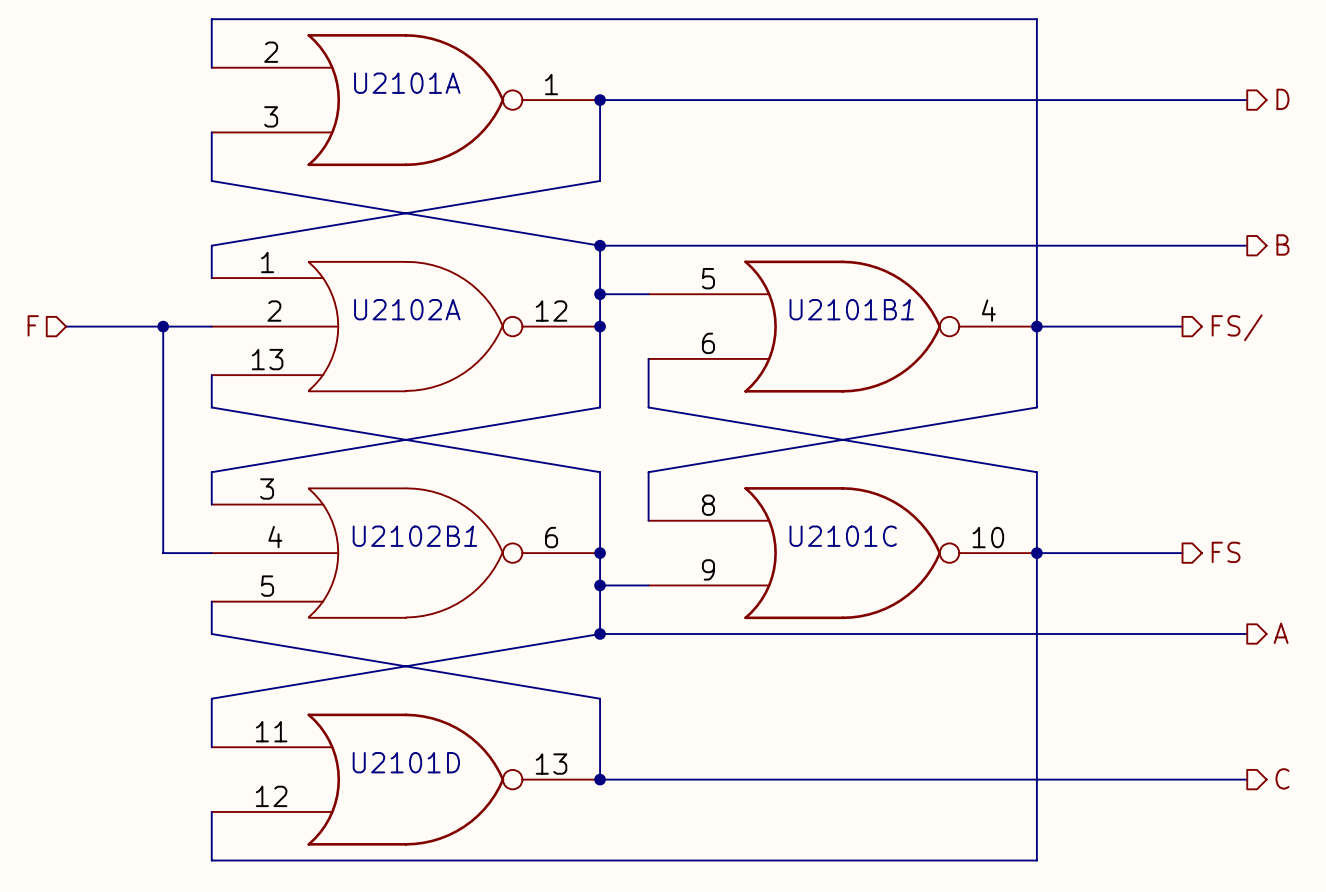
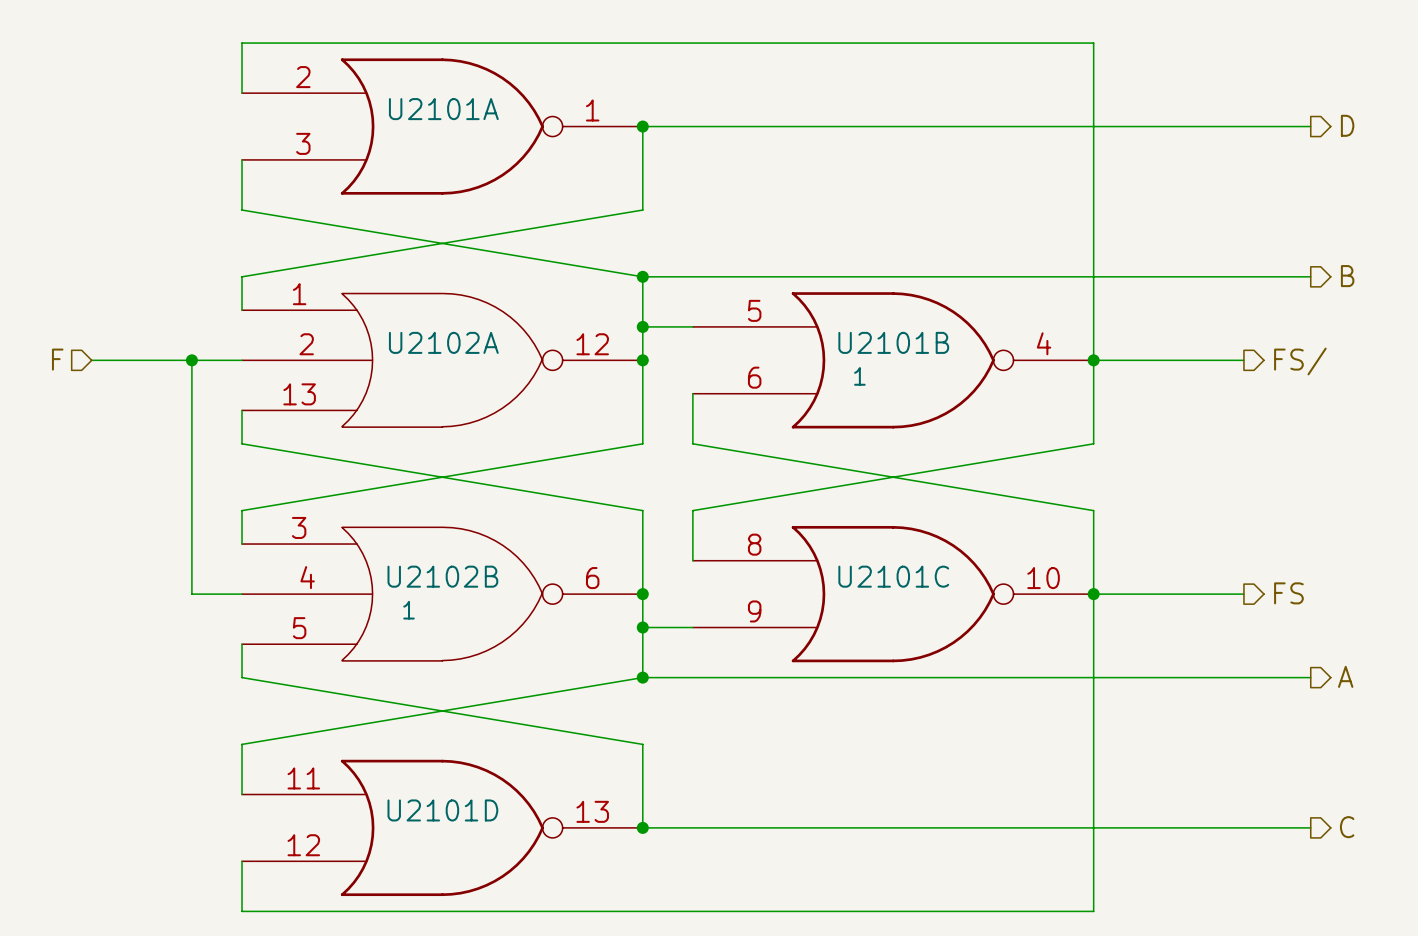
U2101B text: 1 (907, 309) -> none
U2101B text: none -> 1 (859, 376)
U2102B text: 1 (470, 536) -> none
U2102B text: none -> 1 (409, 610)

